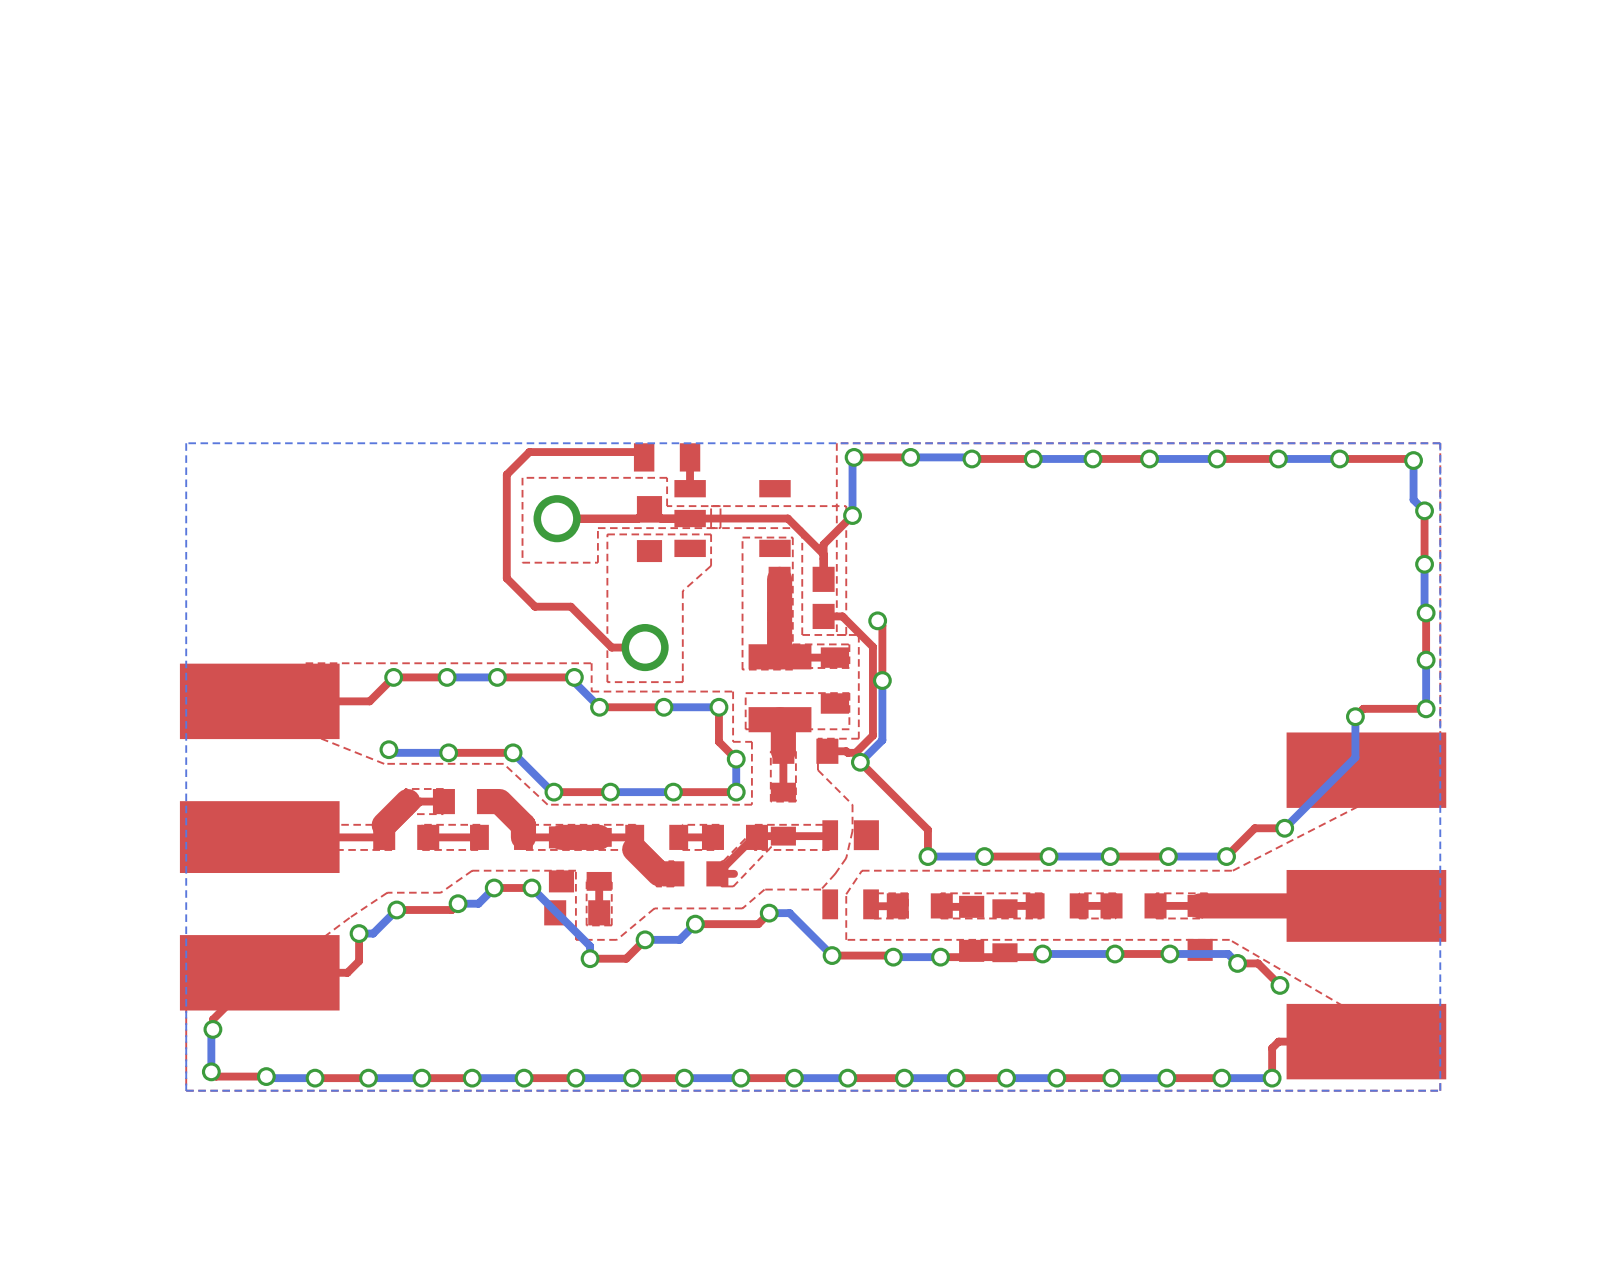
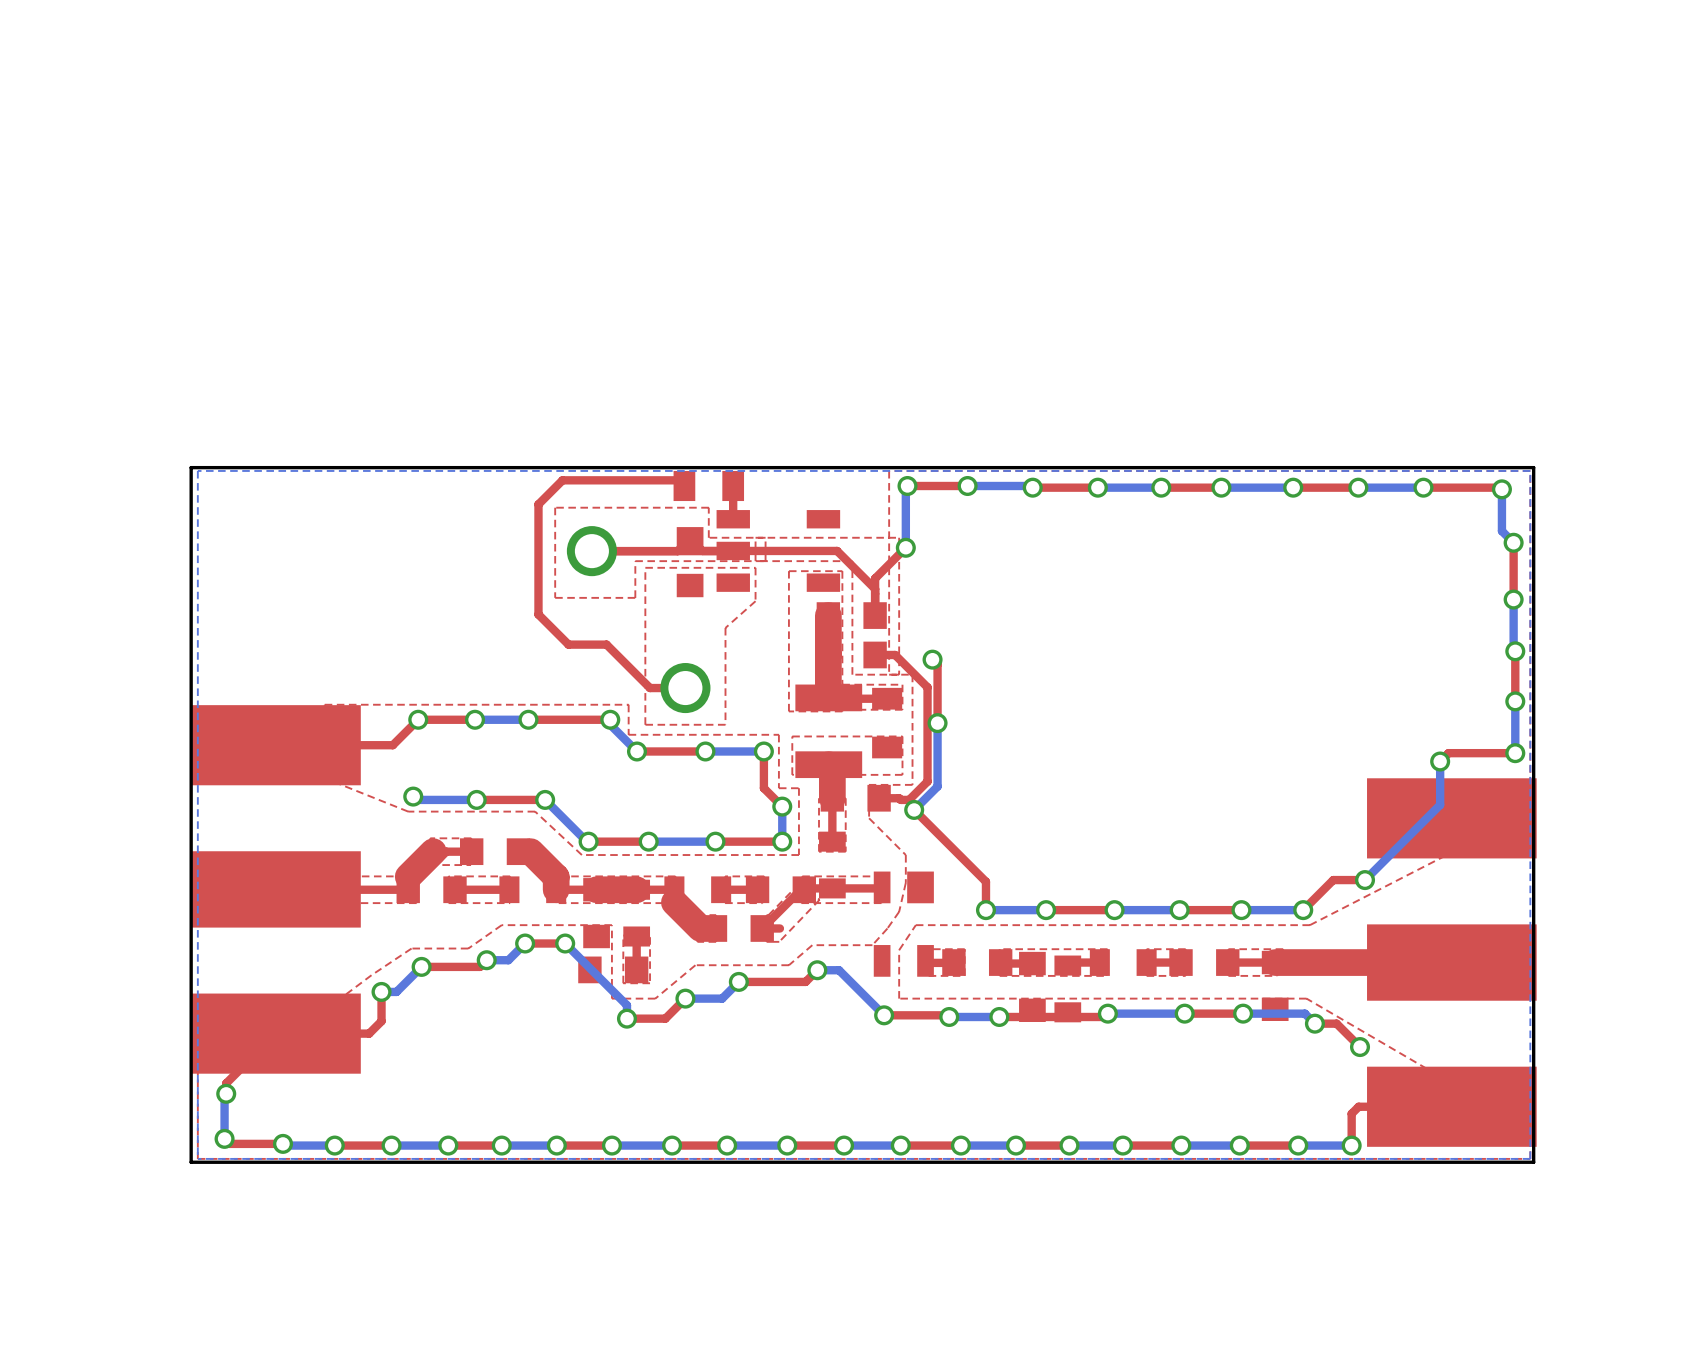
board edge: none -> (1533, 467) (191, 467) (191, 1162) (1533, 1162) (1533, 467)

